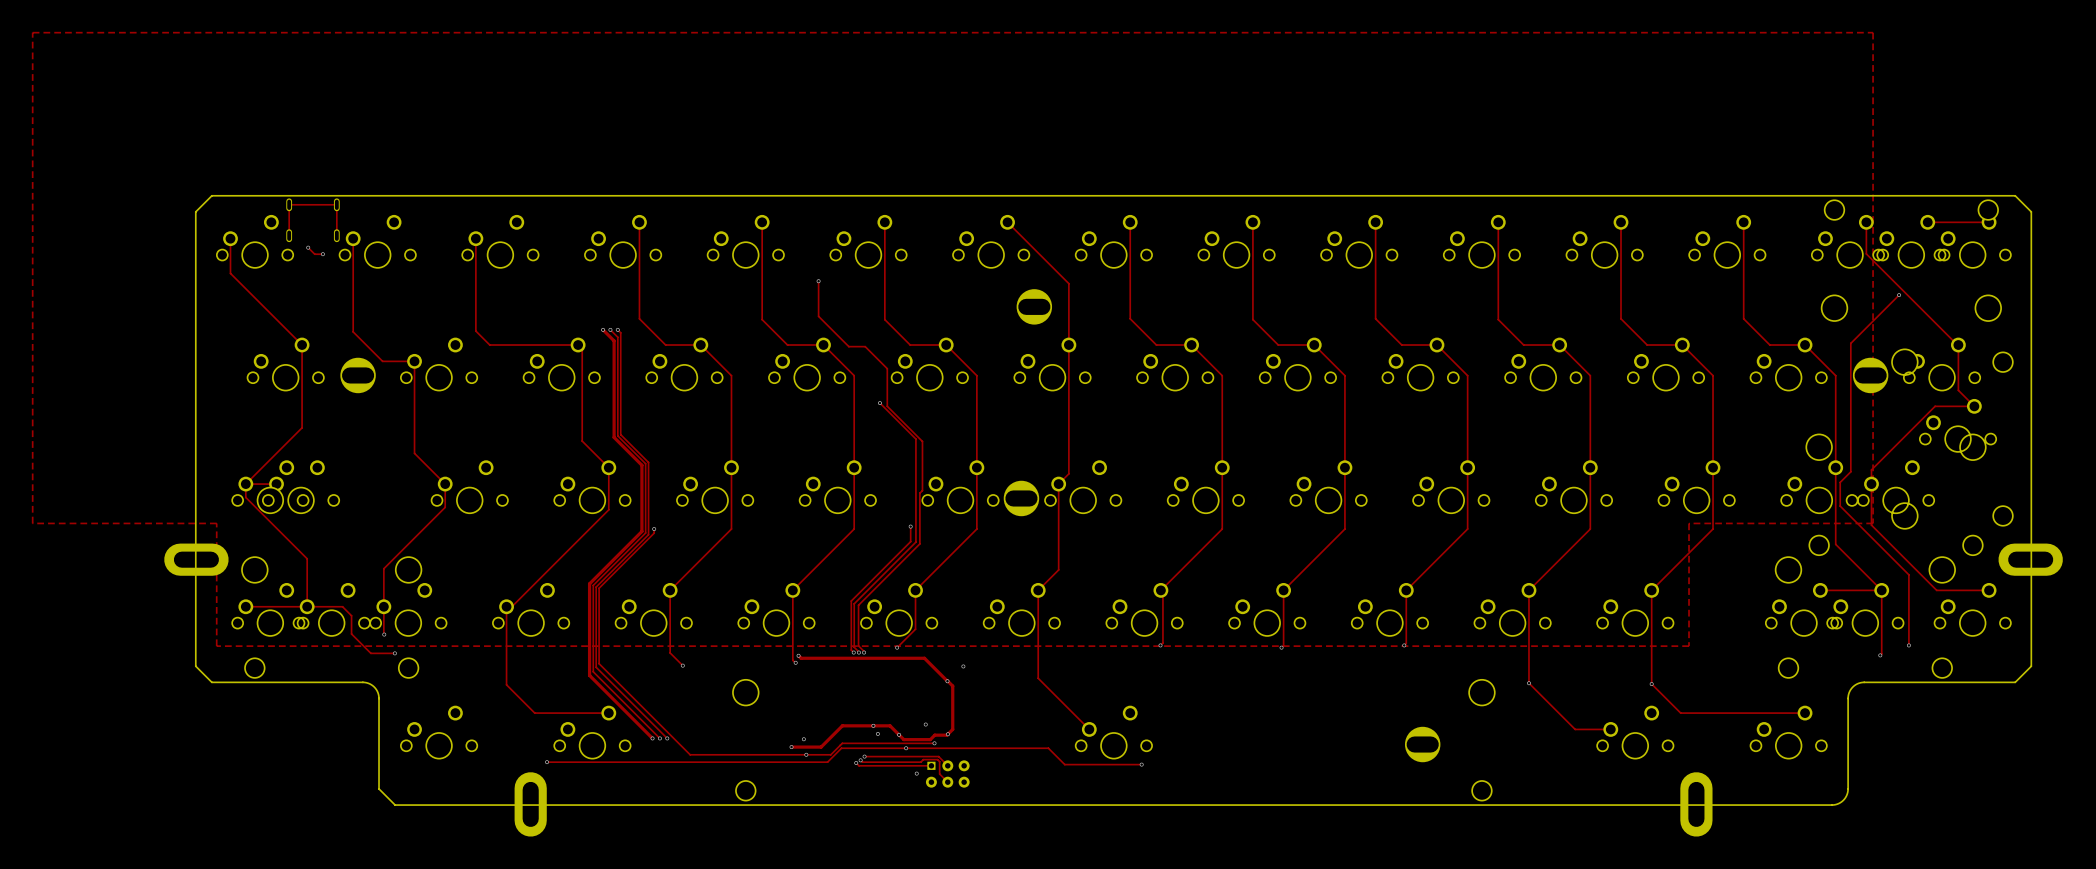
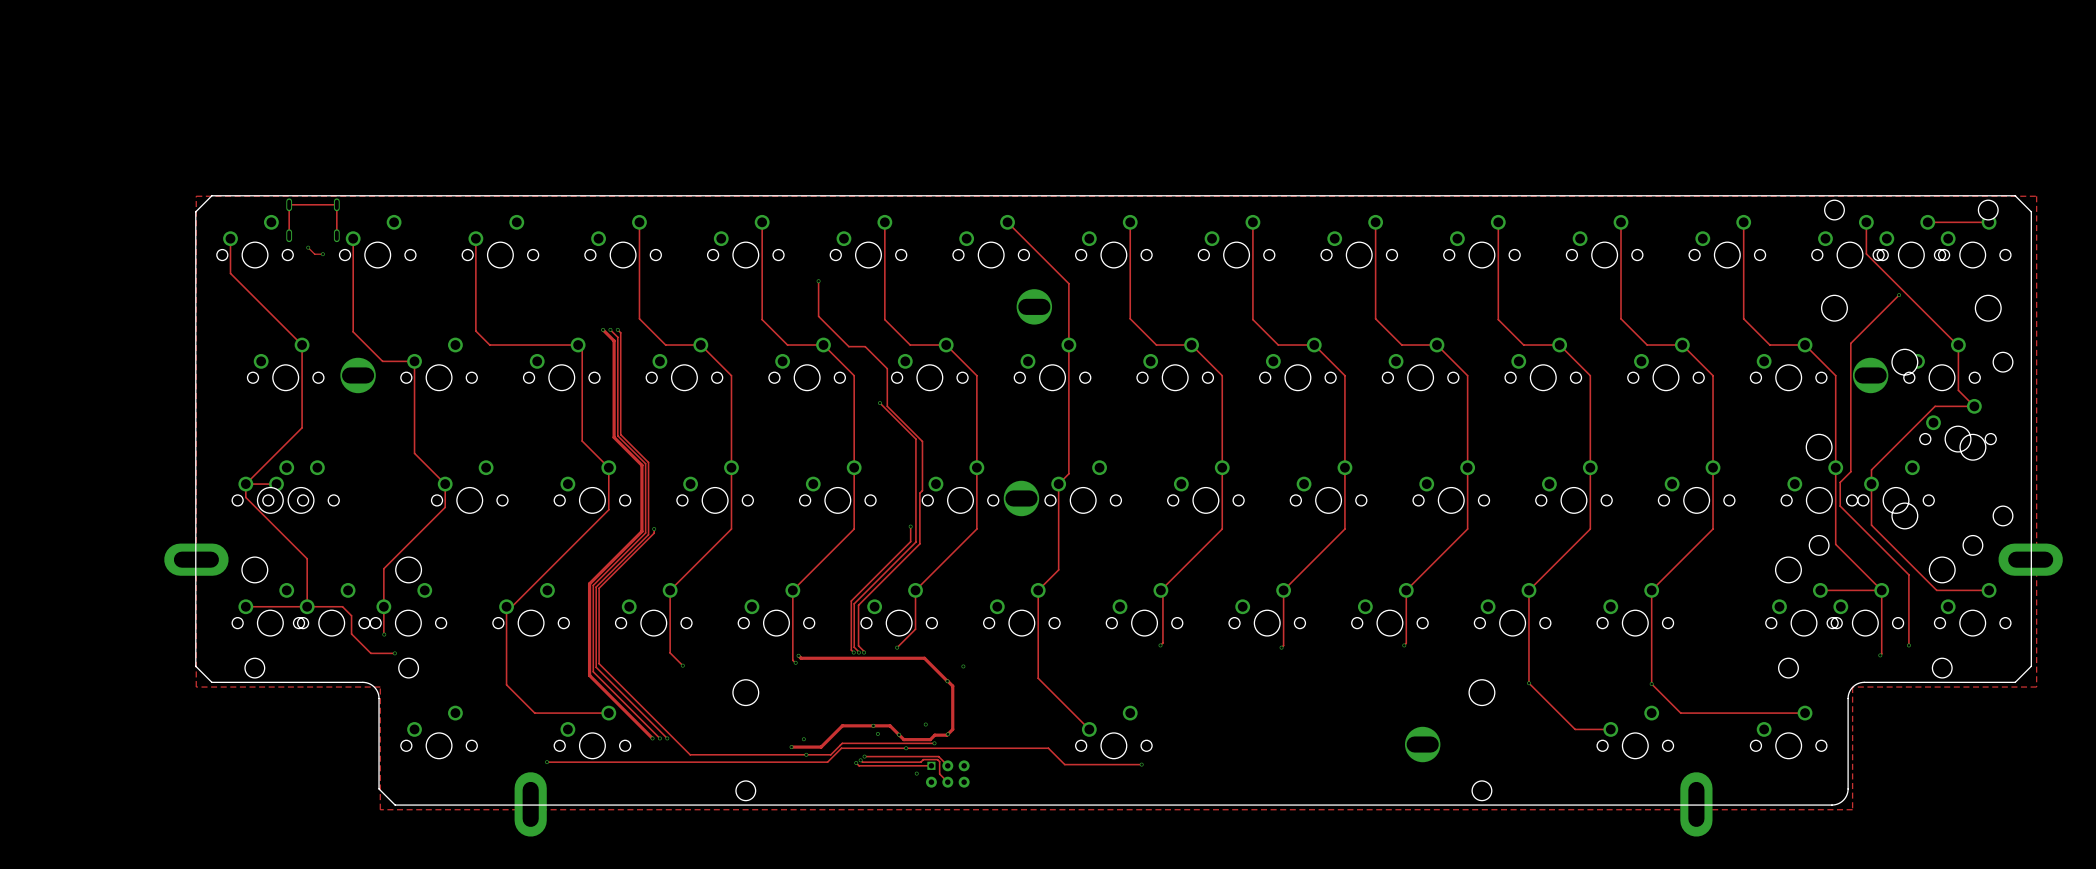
zone outline: (32, 32) (1873, 32) (1873, 523) (1689, 523) (1689, 646) (216, 646) (216, 523) (32, 523) (32, 32) -> (196, 196) (2036, 196) (2036, 687) (1852, 687) (1852, 809) (380, 809) (380, 687) (196, 687) (196, 196)

